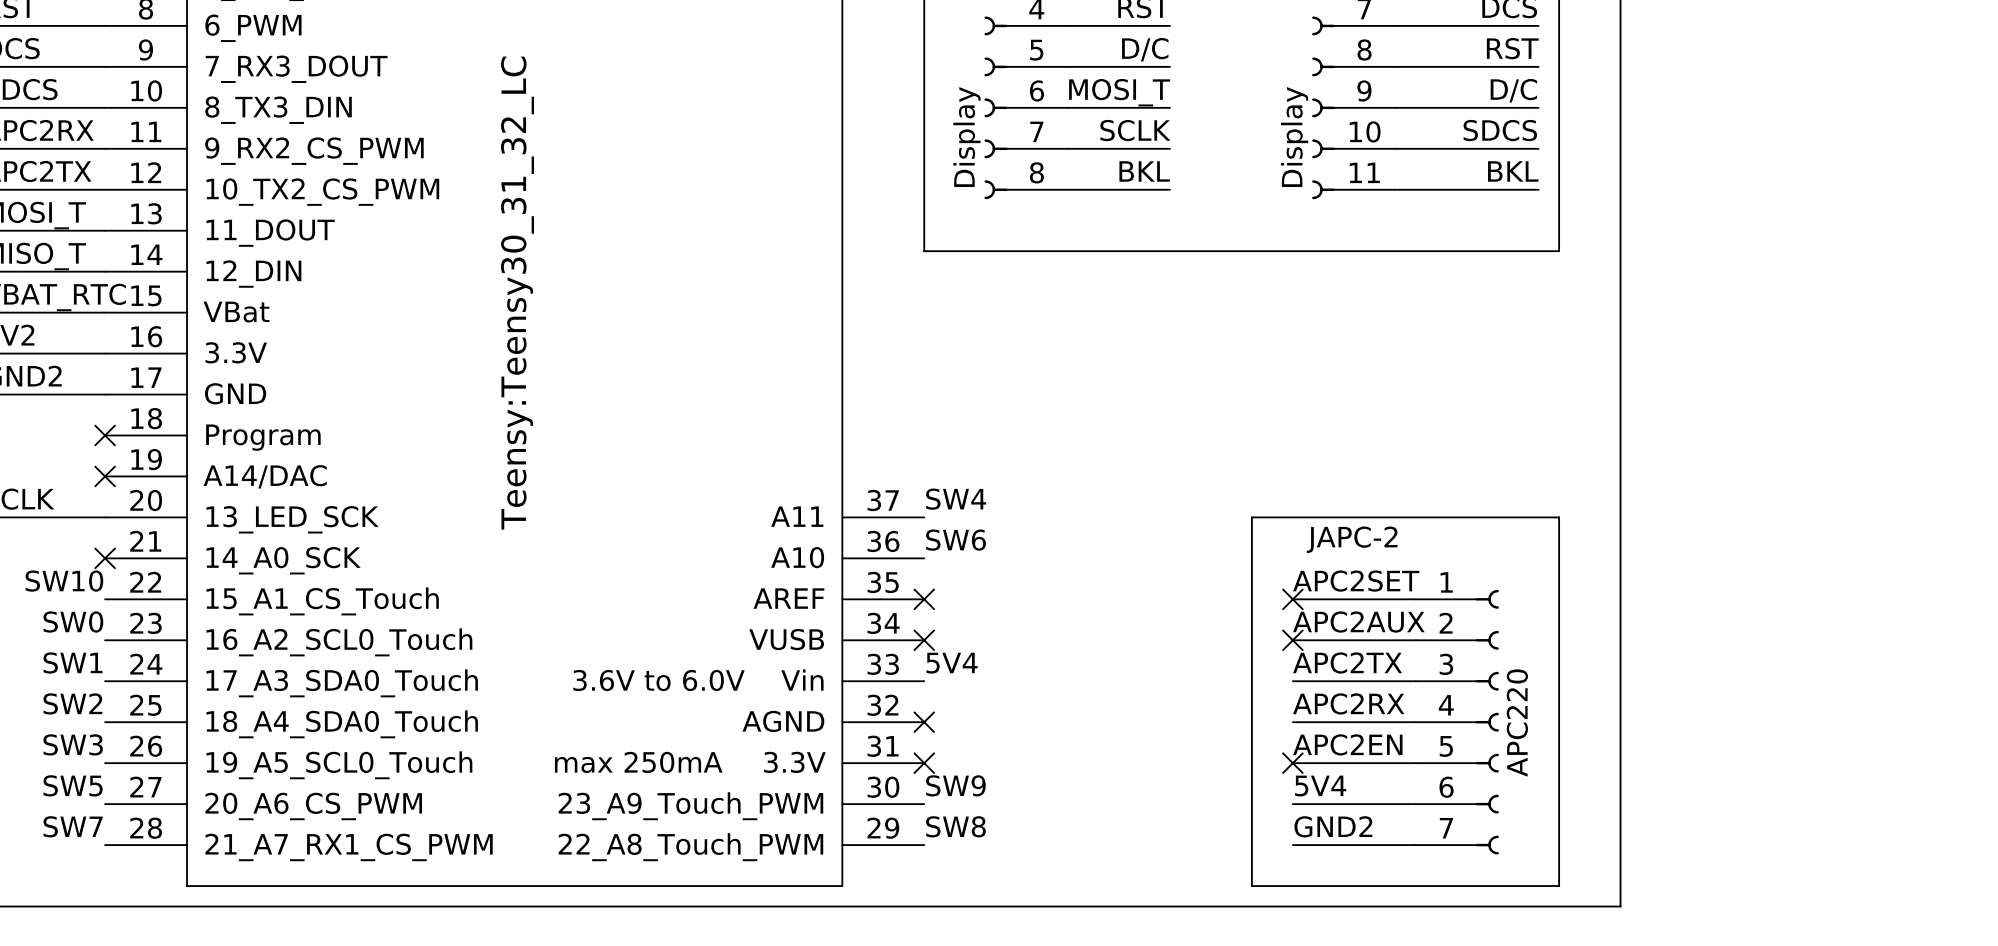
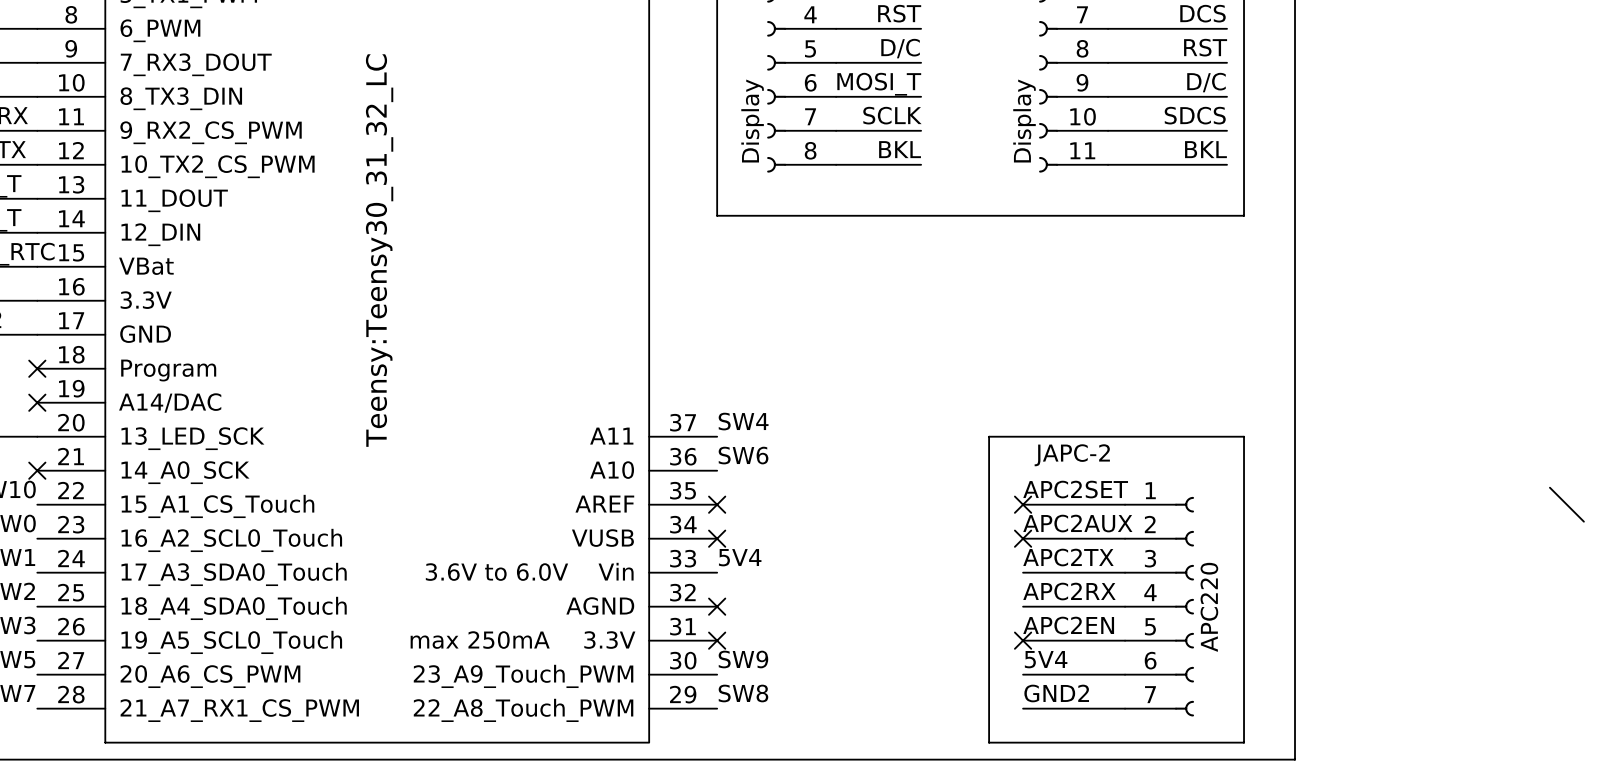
wire: none -> (1549, 487) (1583, 521)

